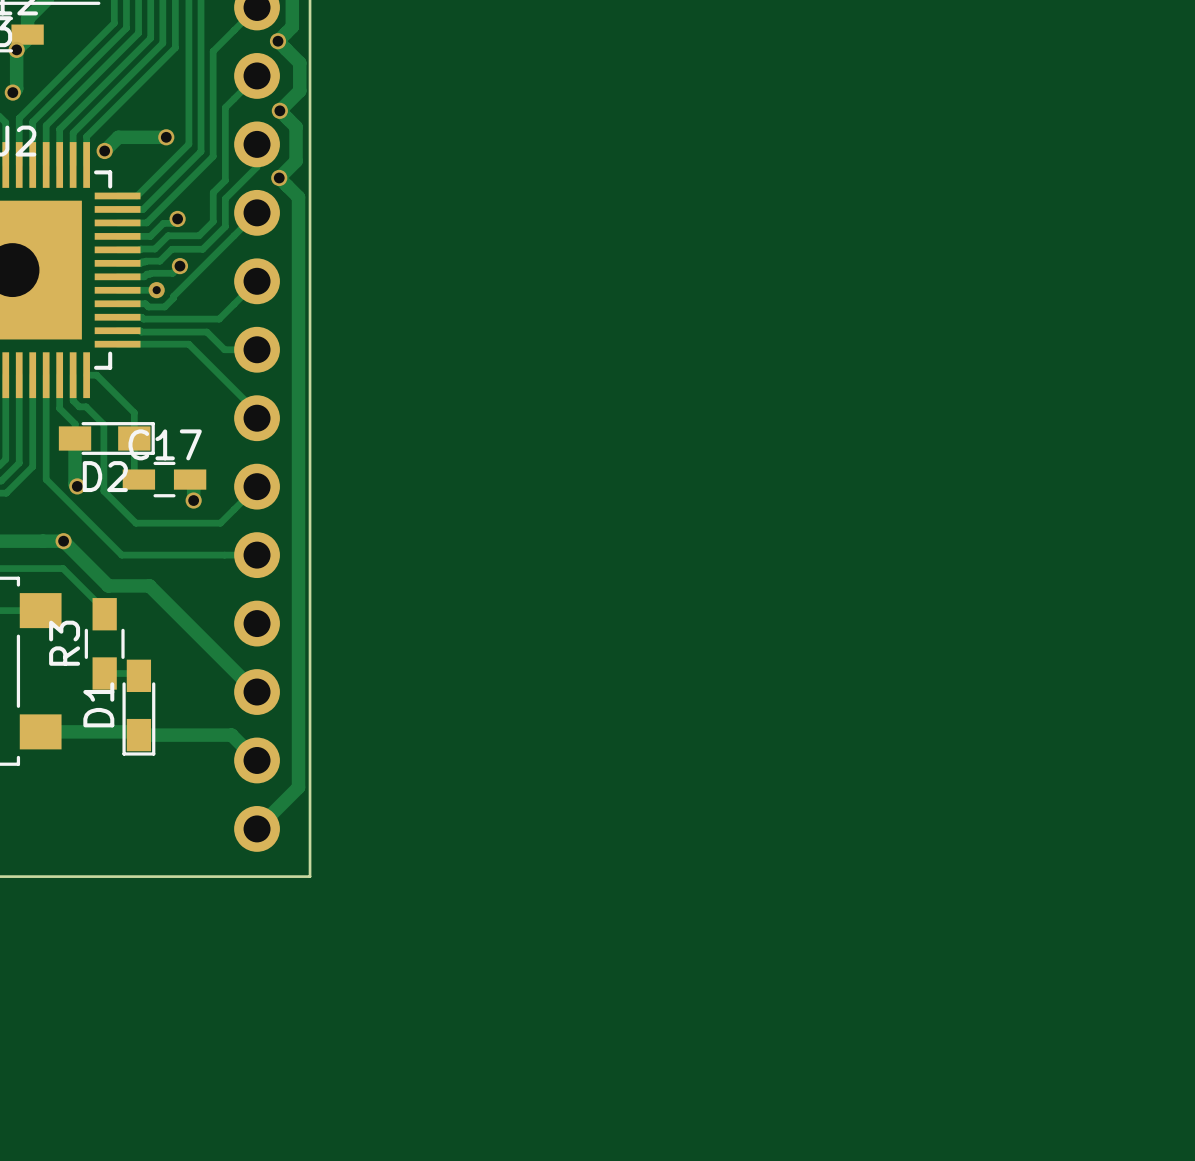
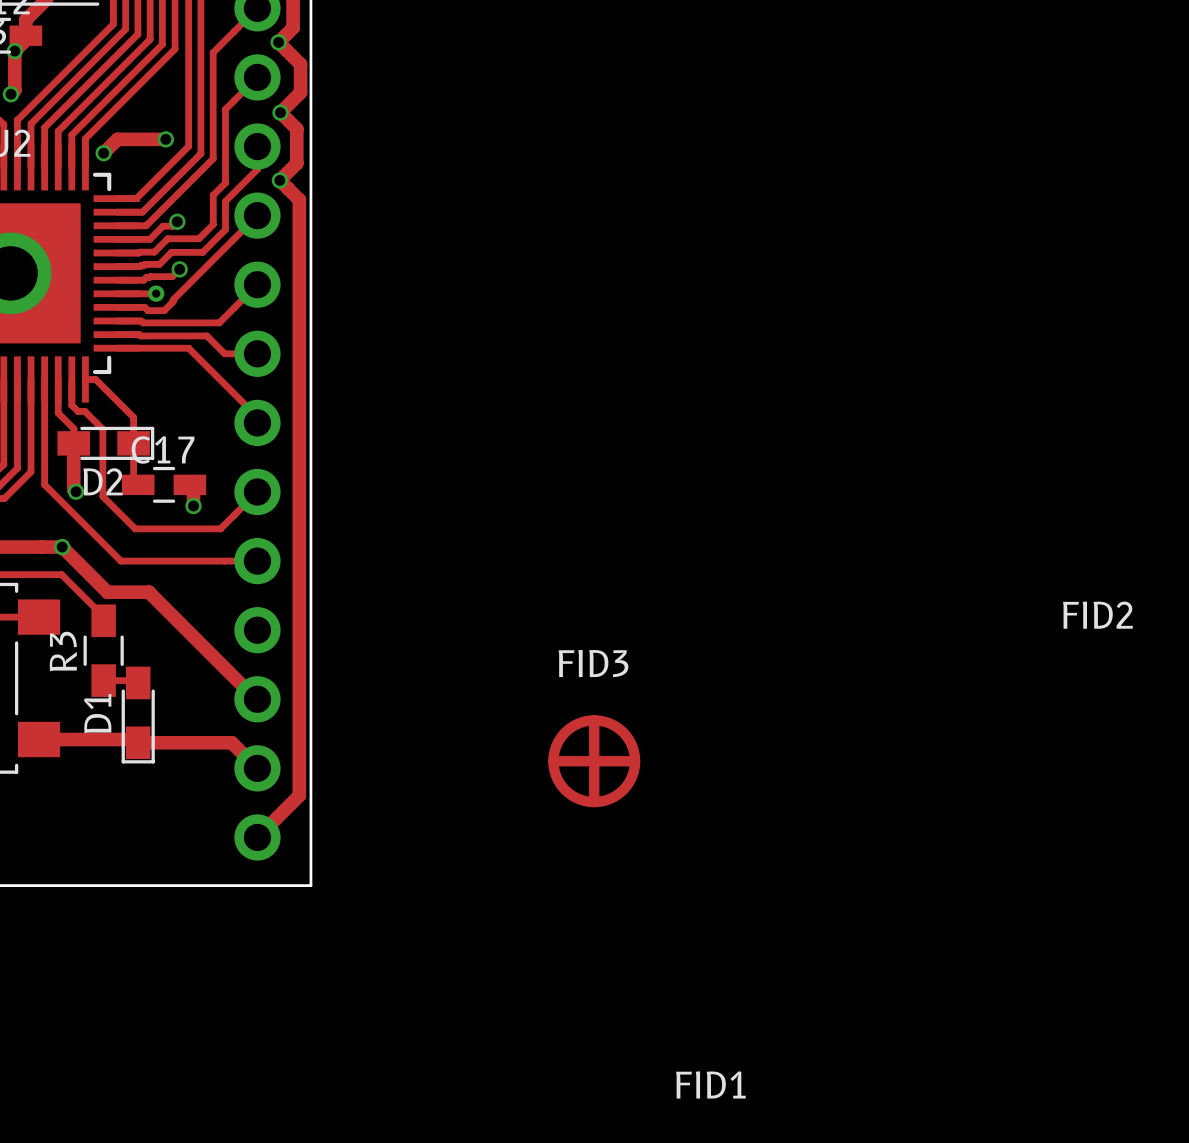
FID2: none -> (1097, 615)
FID3: none -> (594, 761)
FID1: none -> (710, 1084)

